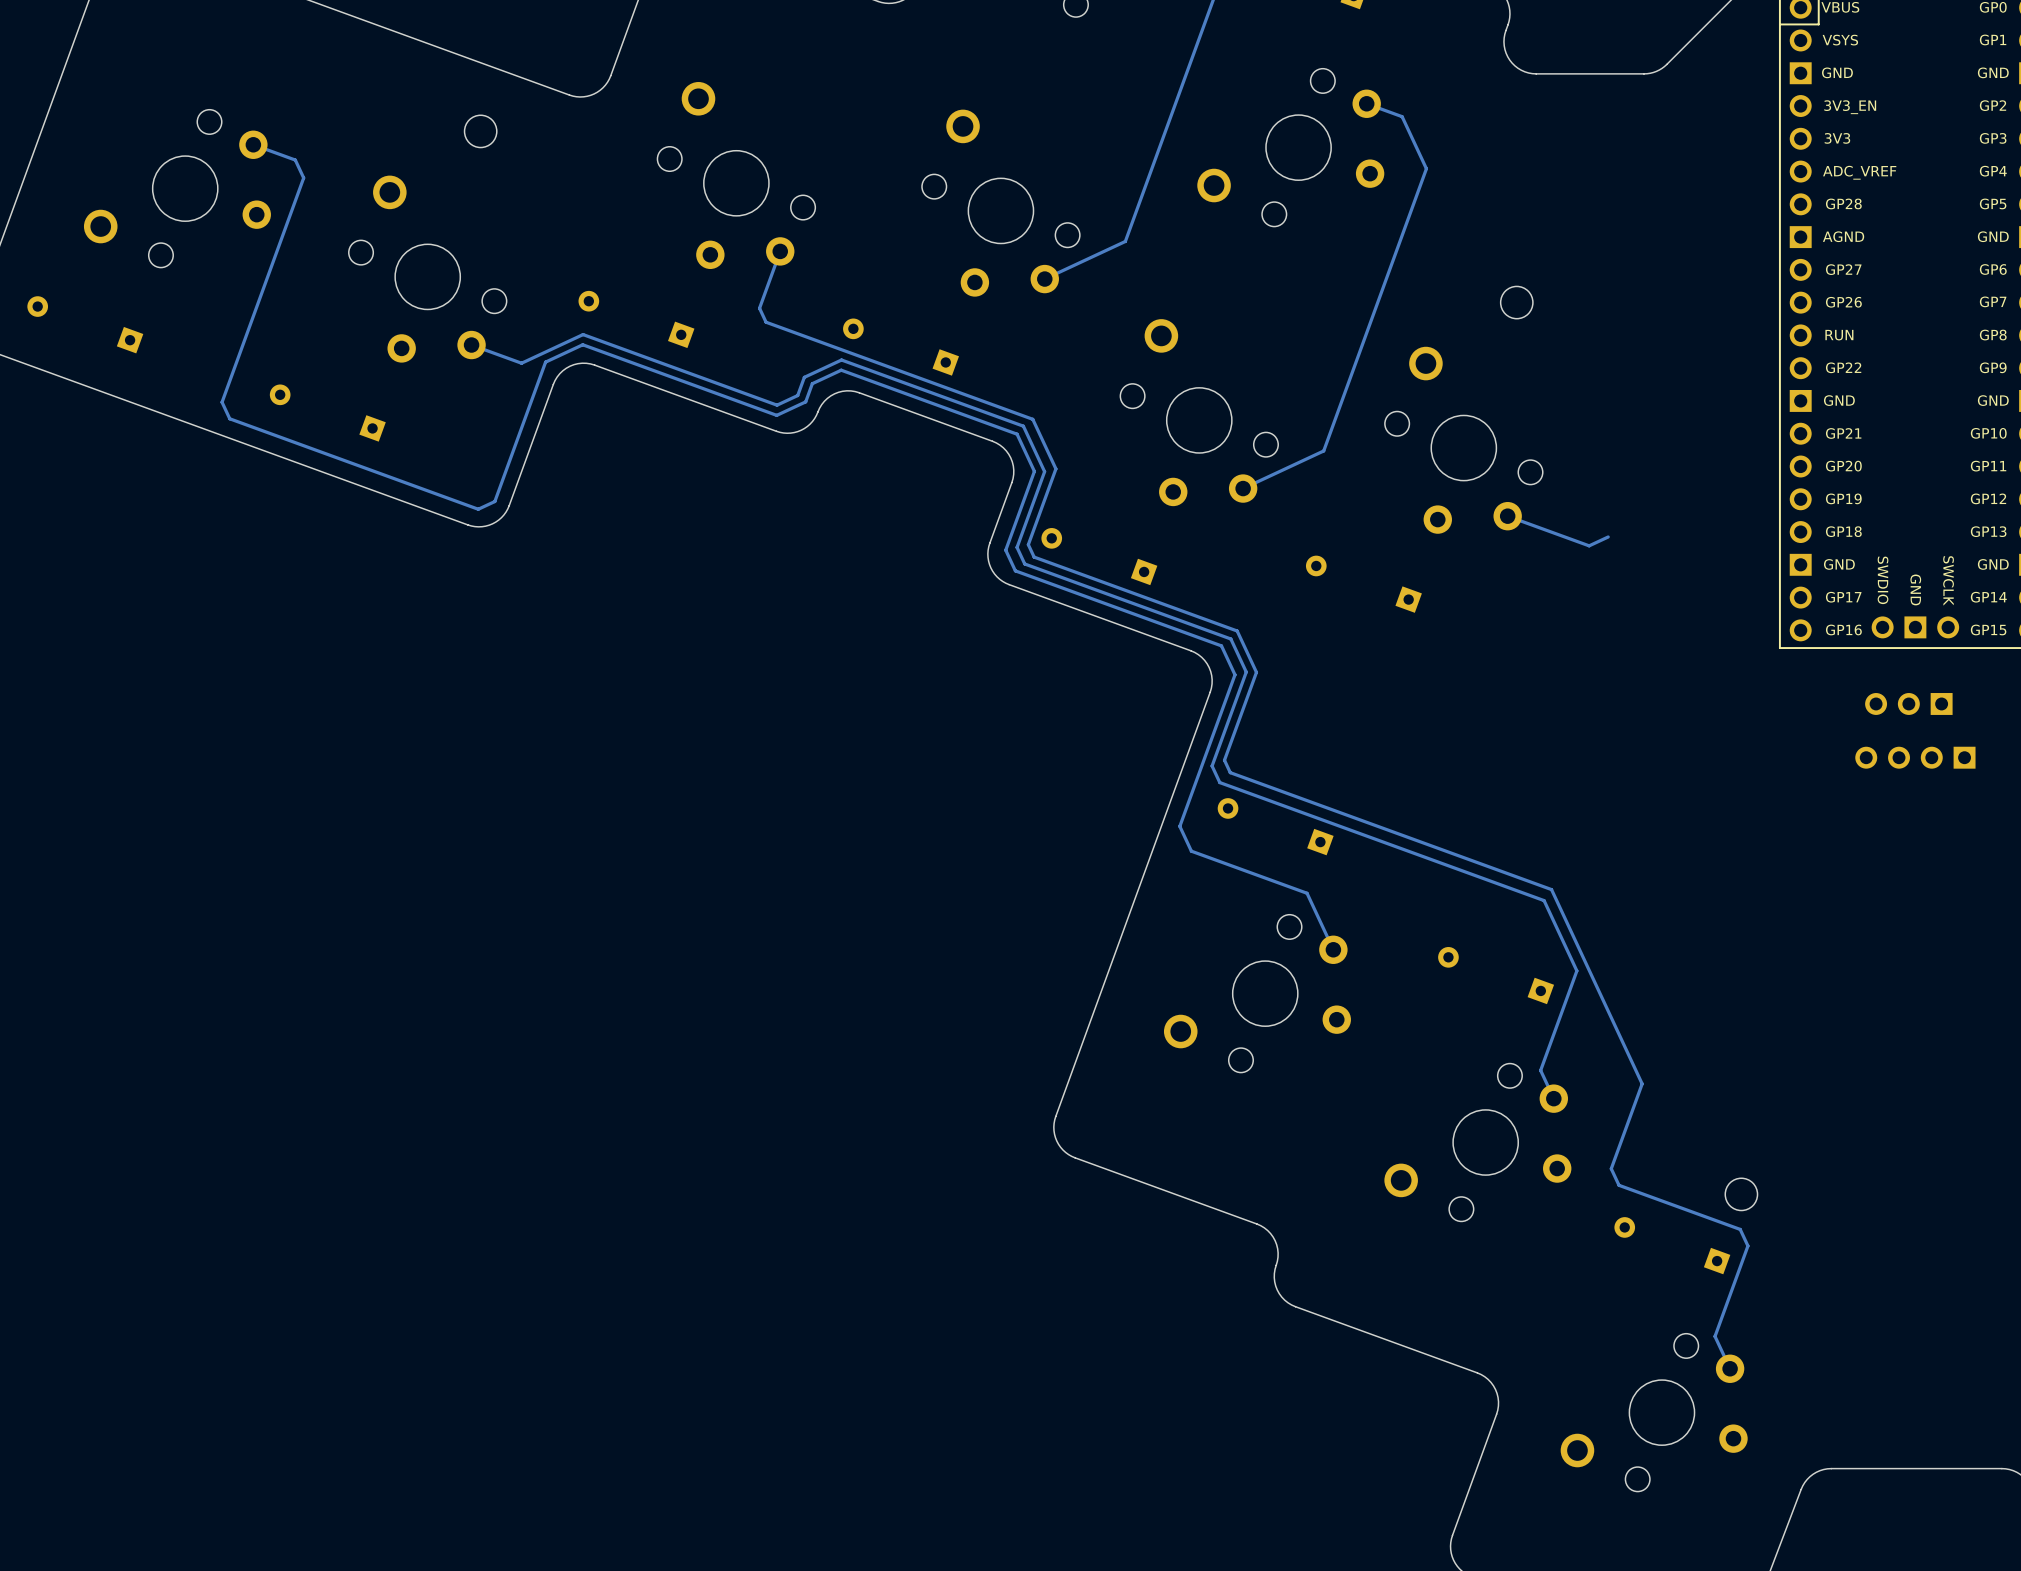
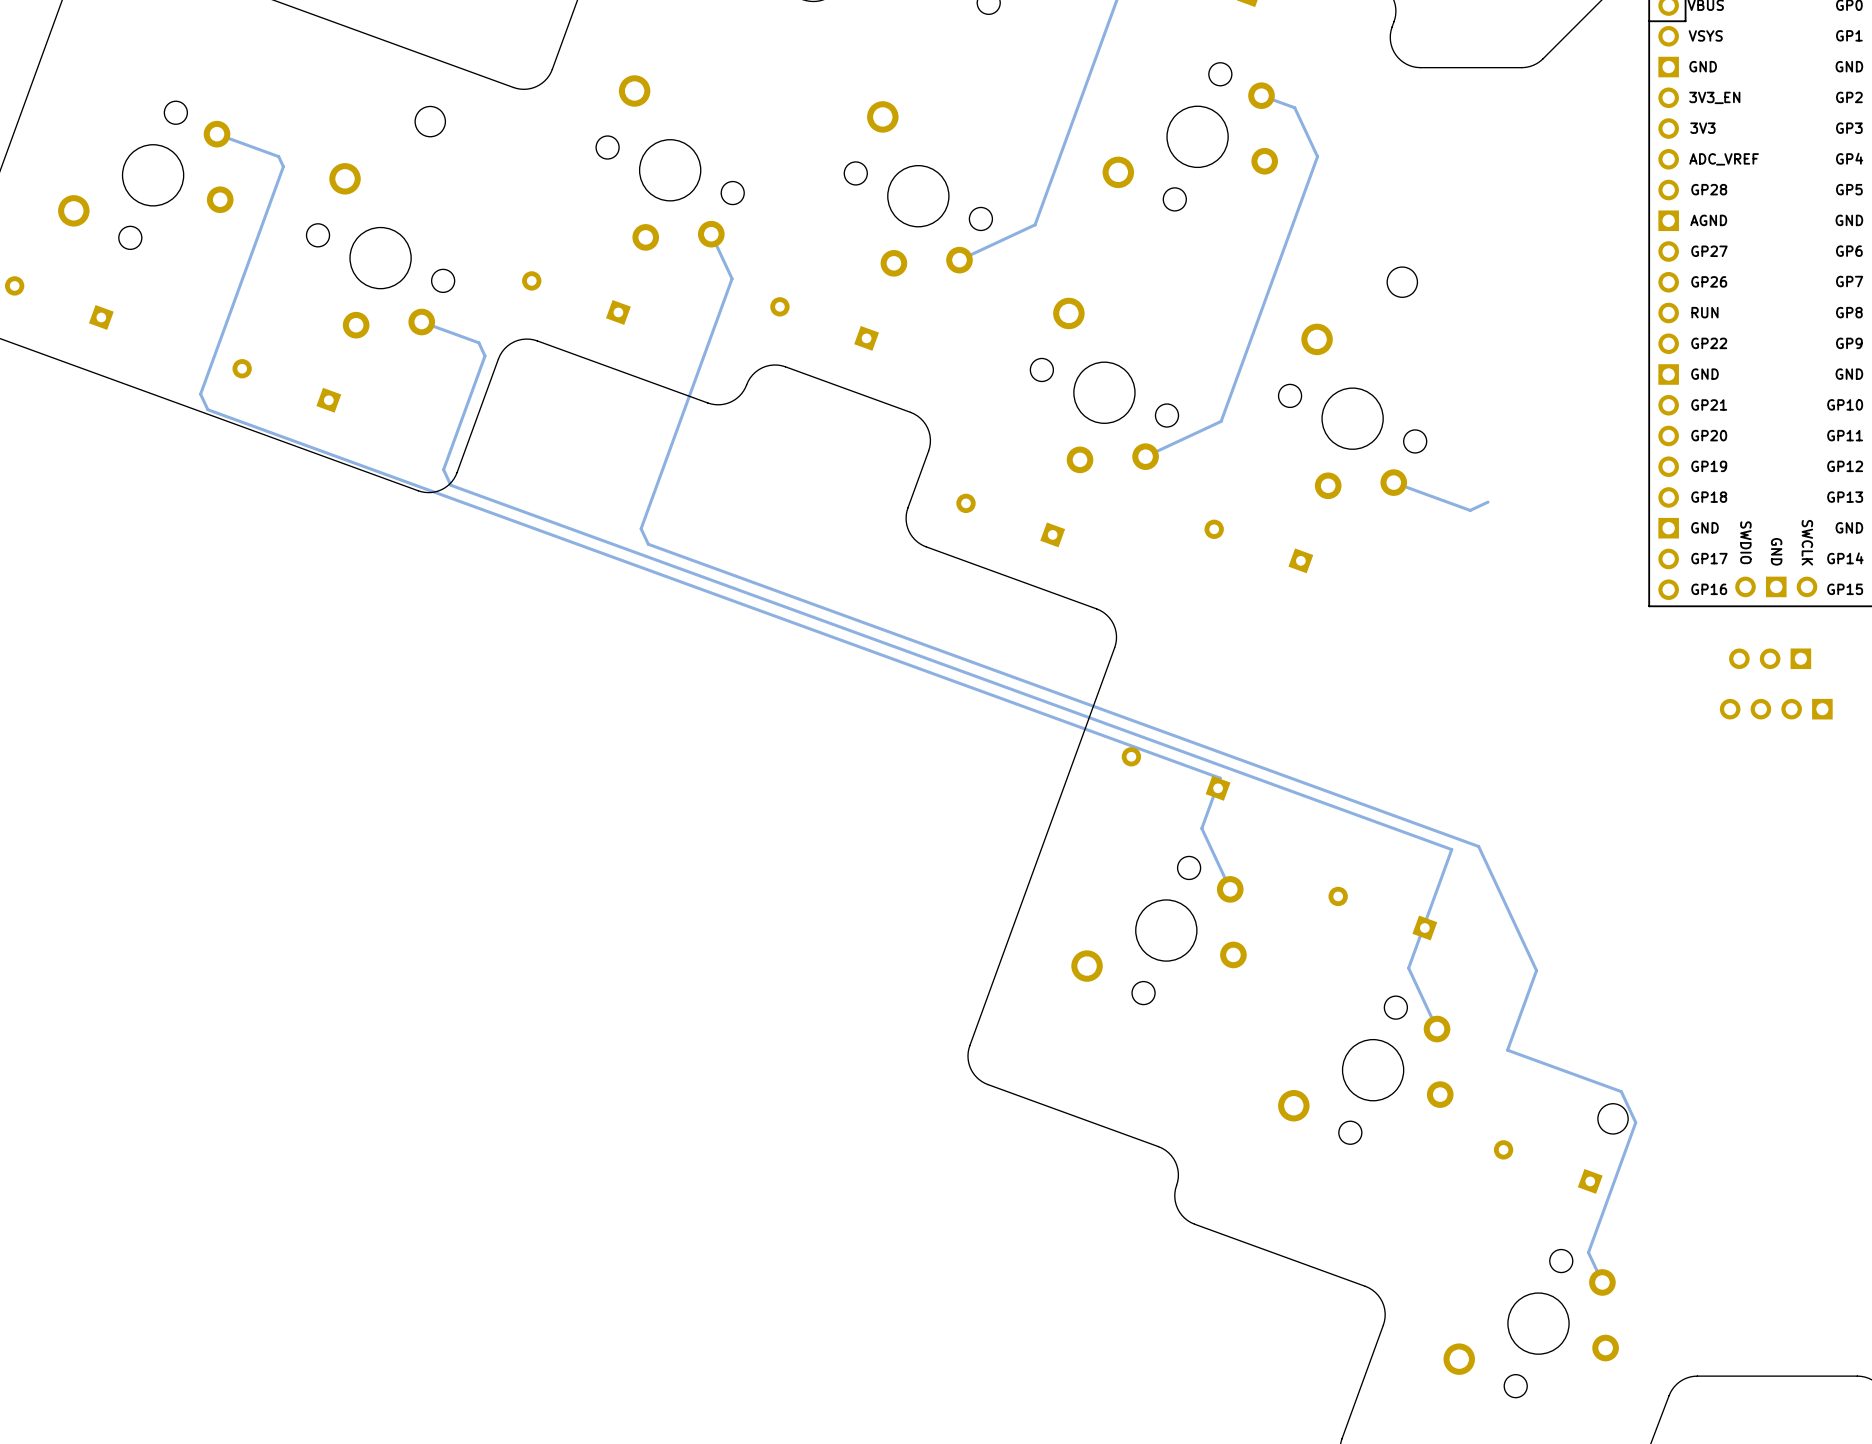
track: (253, 144) (295, 160) (303, 177) (222, 402) (229, 418) (478, 509) (494, 501) (545, 362) (582, 344) (776, 415) (805, 401) (812, 383) (841, 370) (1017, 434) (1034, 471) (1005, 550) (1015, 570) (1221, 645) (1234, 674) (1179, 826) (1191, 851) (1307, 893) -> (217, 134) (278, 156) (283, 166) (200, 394) (207, 409) (1220, 778) (1201, 828) (1205, 836)
track: (780, 251) (759, 308) (766, 322) (1032, 419) (1055, 468) (1028, 544) (1034, 557) (1237, 631) (1256, 672) (1224, 760) (1230, 772) (1551, 889) (1642, 1083) (1611, 1168) (1618, 1185) (1740, 1229) (1747, 1245) (1715, 1336) (1730, 1368) -> (711, 234) (732, 278) (641, 528) (648, 544) (1478, 846) (1536, 970) (1507, 1050) (1621, 1091) (1635, 1122) (1588, 1252) (1602, 1282)
track: (471, 345) (521, 363) (583, 334) (777, 405) (797, 395) (804, 377) (841, 360) (1023, 426) (1044, 471) (1017, 547) (1024, 563) (1230, 638) (1246, 672) (1212, 766) (1219, 782) (1544, 900) (1576, 970) (1540, 1070) -> (421, 322) (478, 342) (485, 356) (443, 469) (450, 485) (1451, 849) (1408, 968) (1424, 1002)

